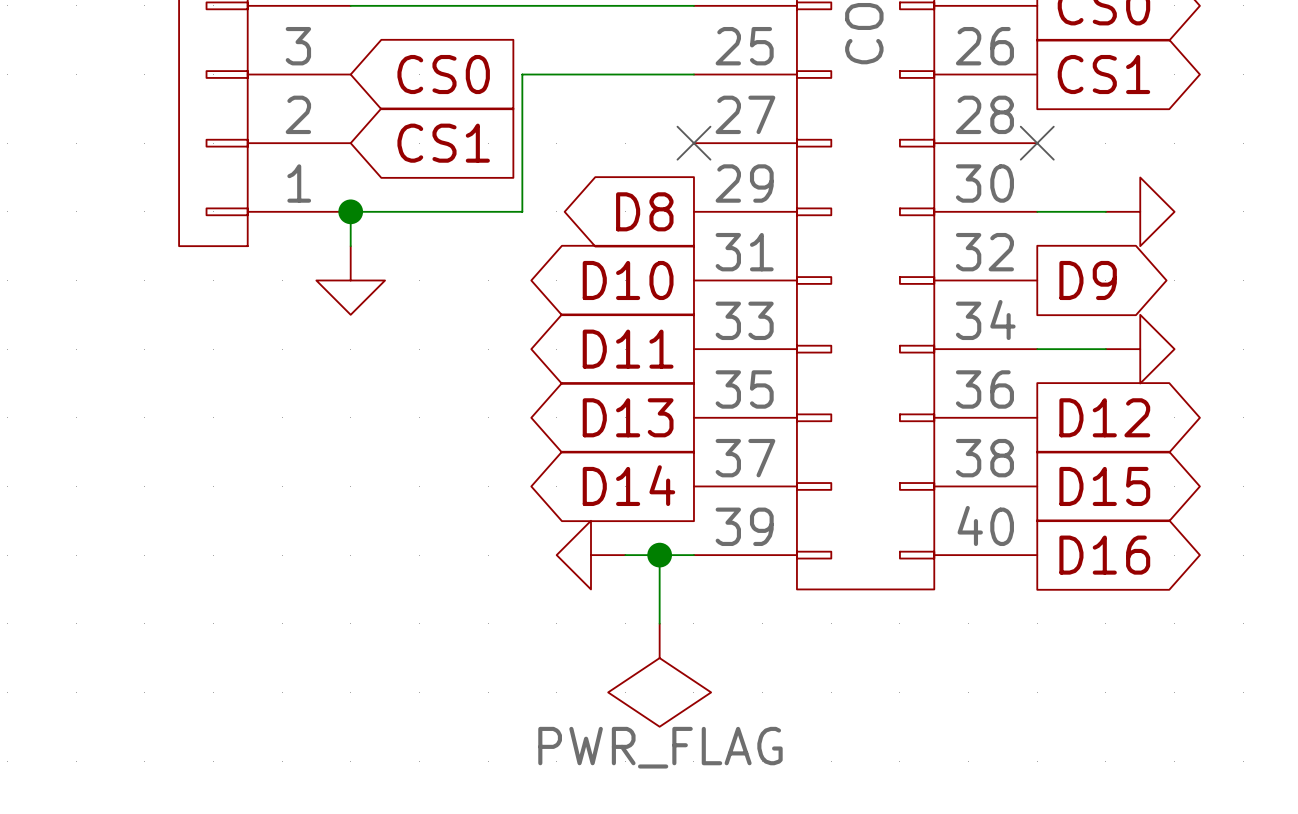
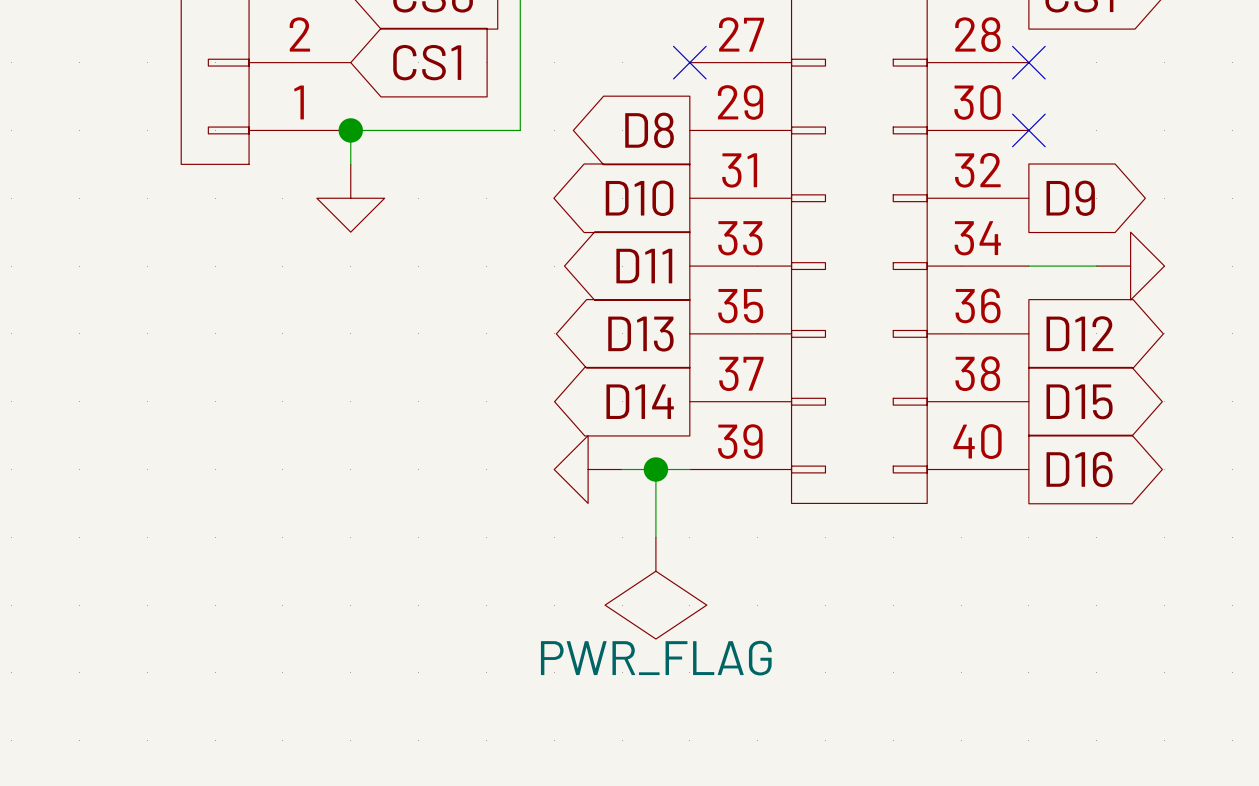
wire: (1037, 211) (1105, 211) -> none
no-connect mark: none -> (1028, 130)
power symbol: (1140, 211) -> none

